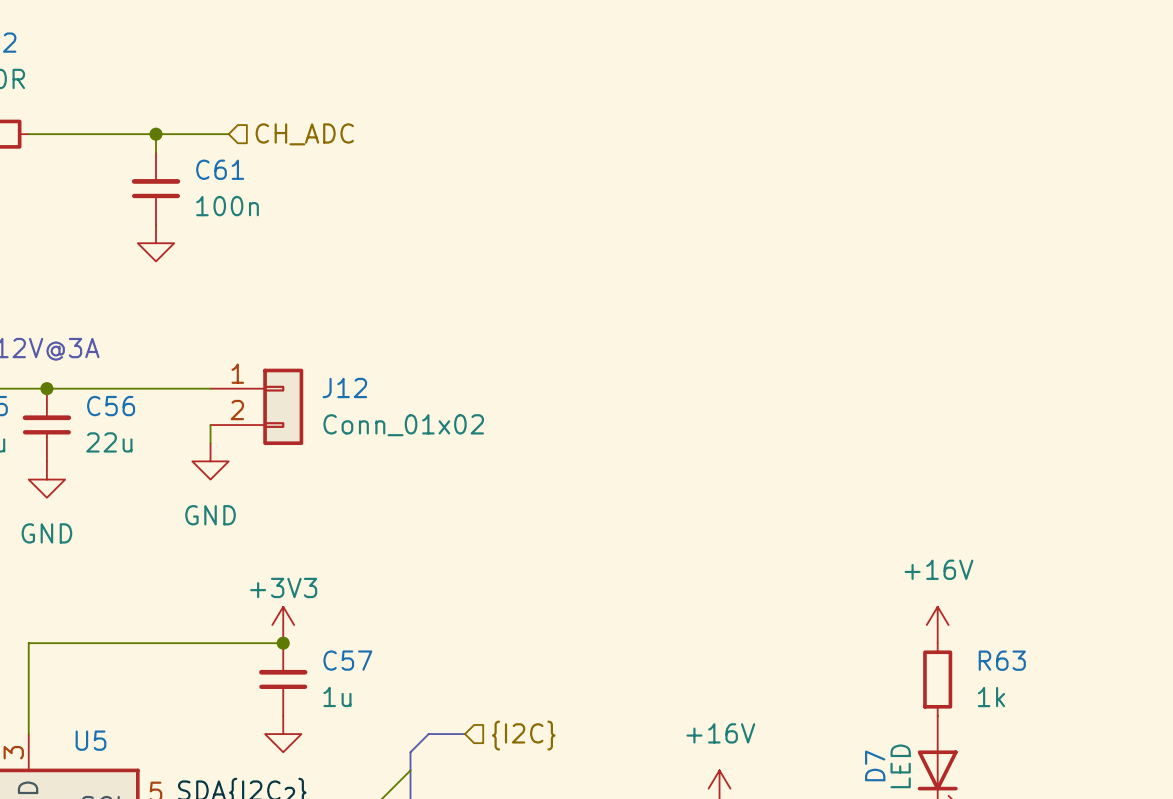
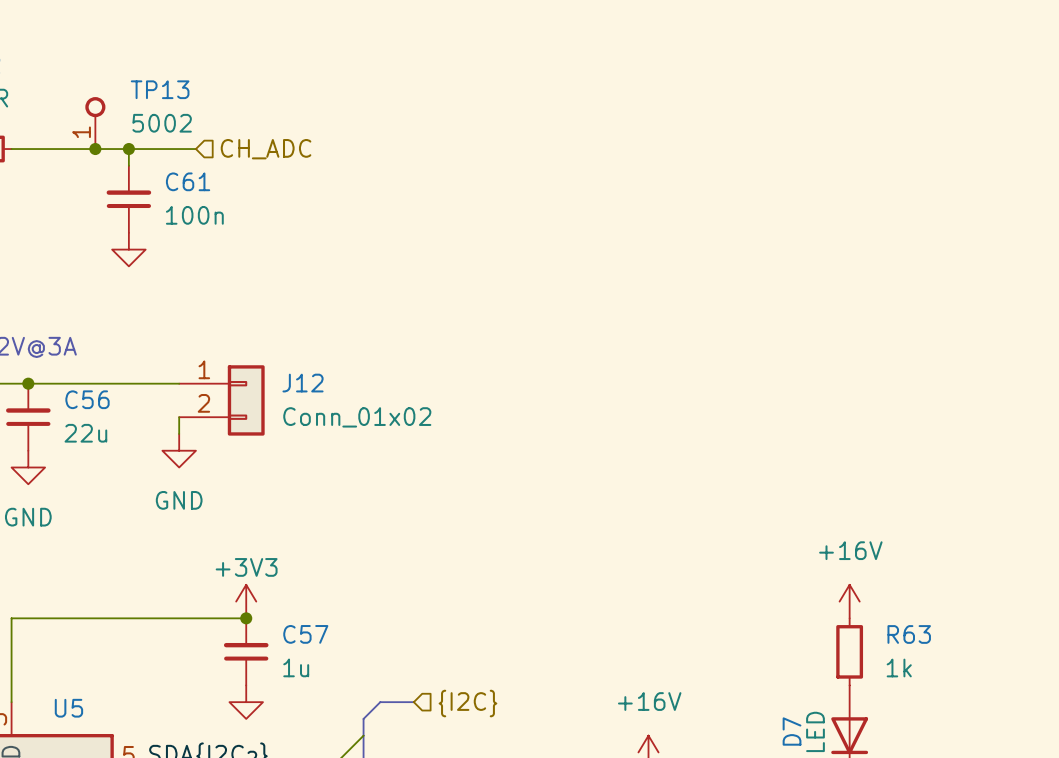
TP13: none -> (95, 123)
junction: none -> (95, 149)

